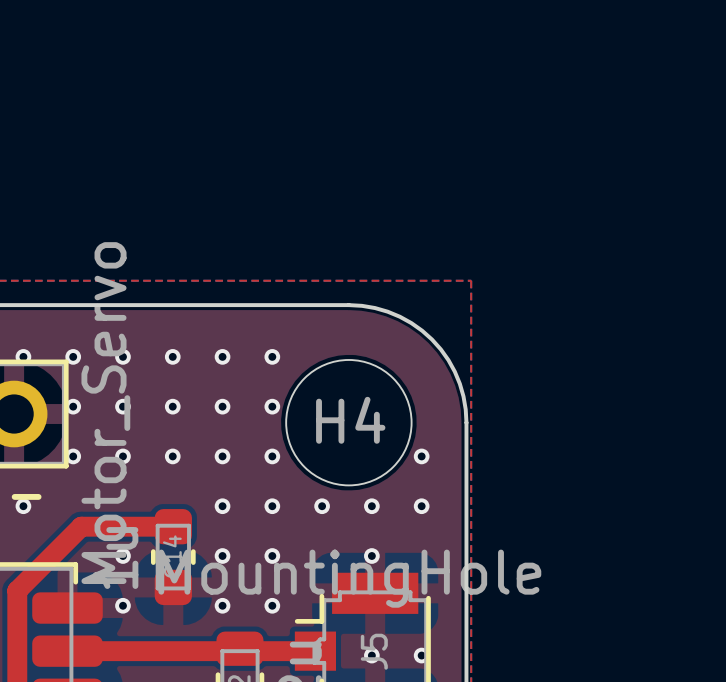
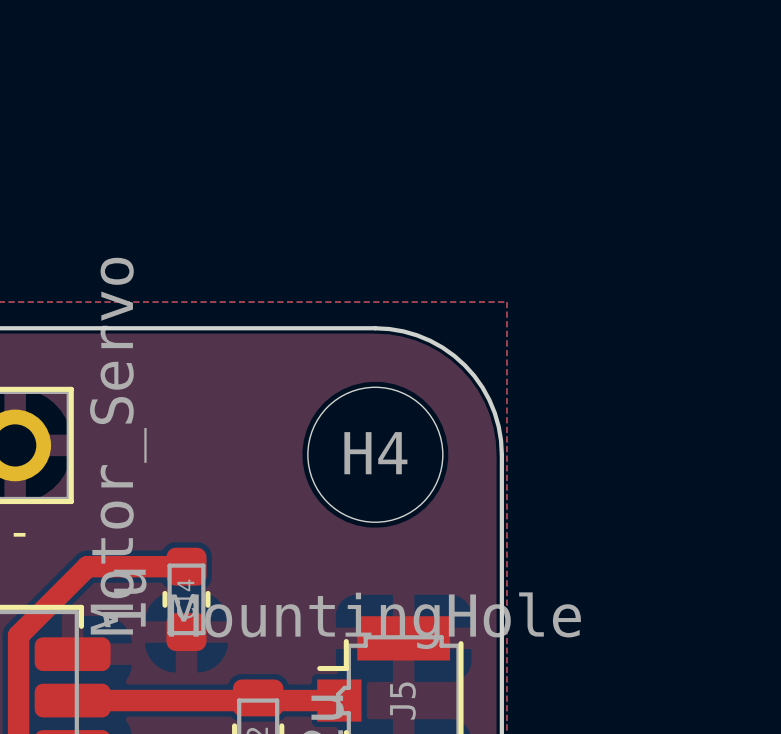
via: (23, 356) -> none
via: (73, 356) -> none
via: (122, 356) -> none
via: (172, 356) -> none
via: (222, 356) -> none
via: (272, 356) -> none
via: (73, 406) -> none
via: (122, 406) -> none
via: (172, 406) -> none
via: (222, 406) -> none
via: (272, 406) -> none
via: (73, 456) -> none
via: (122, 456) -> none
via: (172, 456) -> none
via: (222, 456) -> none
via: (272, 456) -> none
via: (421, 456) -> none
via: (23, 506) -> none
via: (222, 506) -> none
via: (272, 506) -> none
via: (322, 506) -> none
via: (371, 506) -> none
via: (421, 506) -> none
via: (122, 556) -> none
via: (222, 556) -> none
via: (272, 556) -> none
via: (371, 556) -> none
via: (122, 605) -> none
via: (222, 605) -> none
via: (272, 605) -> none
via: (371, 655) -> none
via: (421, 655) -> none

